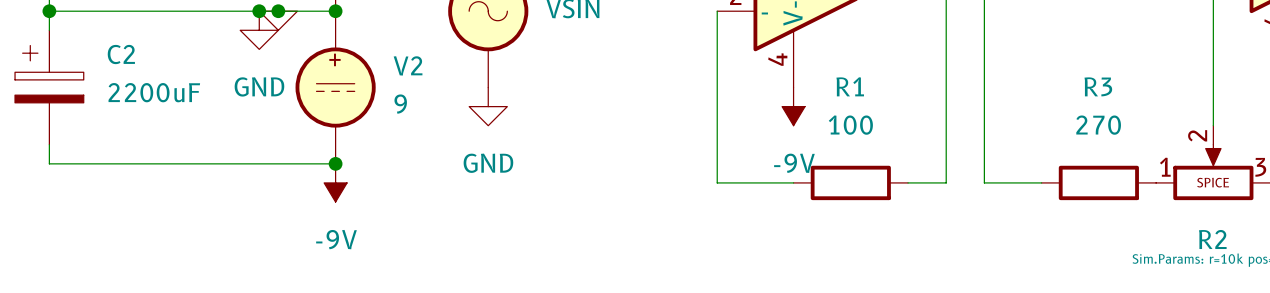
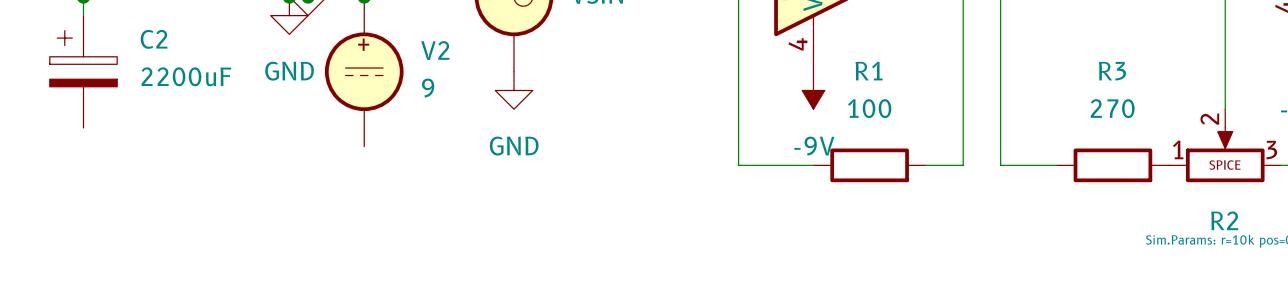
wire: (49, 144) (49, 163) (335, 163) -> none
junction: (335, 163) -> none
power symbol: -9V (335, 182) -> none

